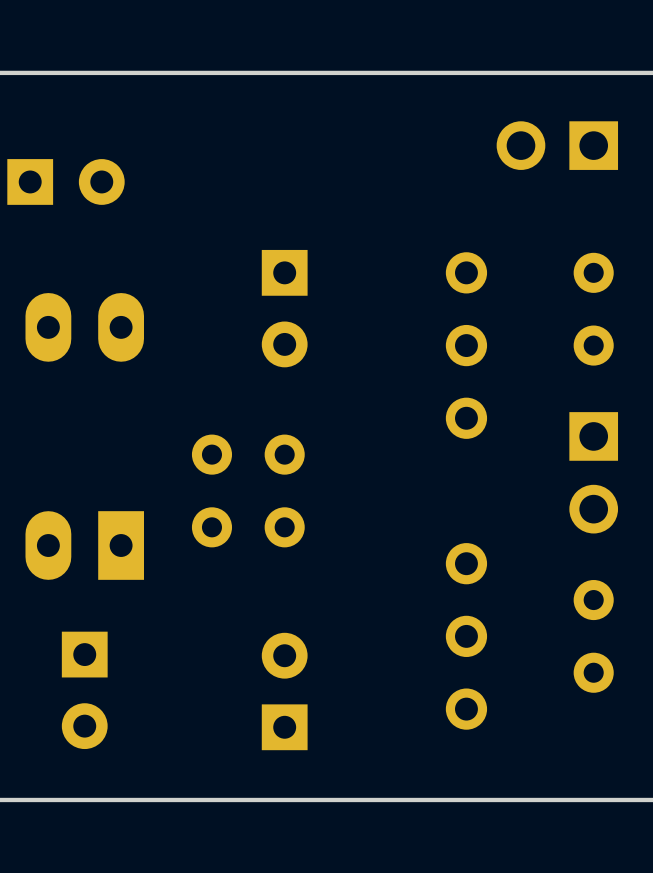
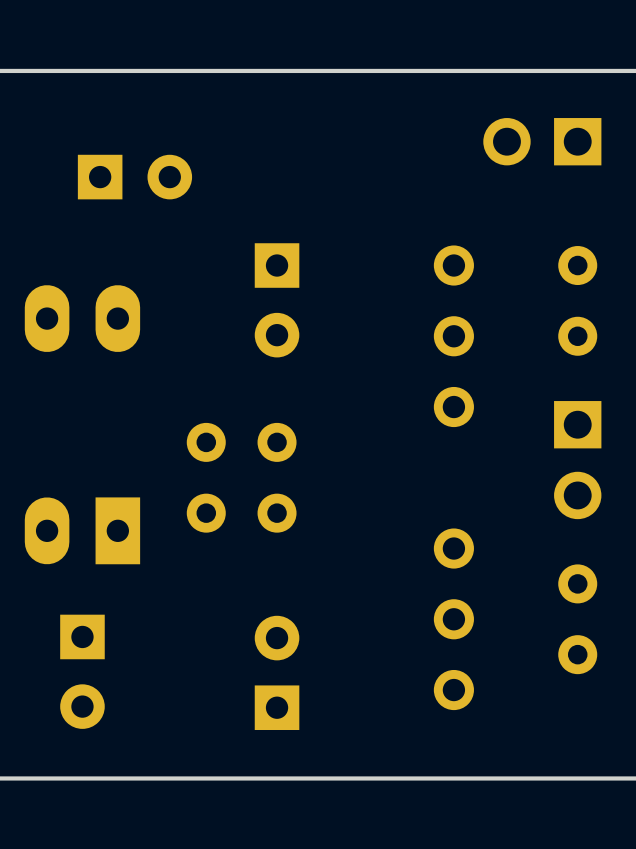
part: (65, 181) -> none
part: none -> (134, 177)

